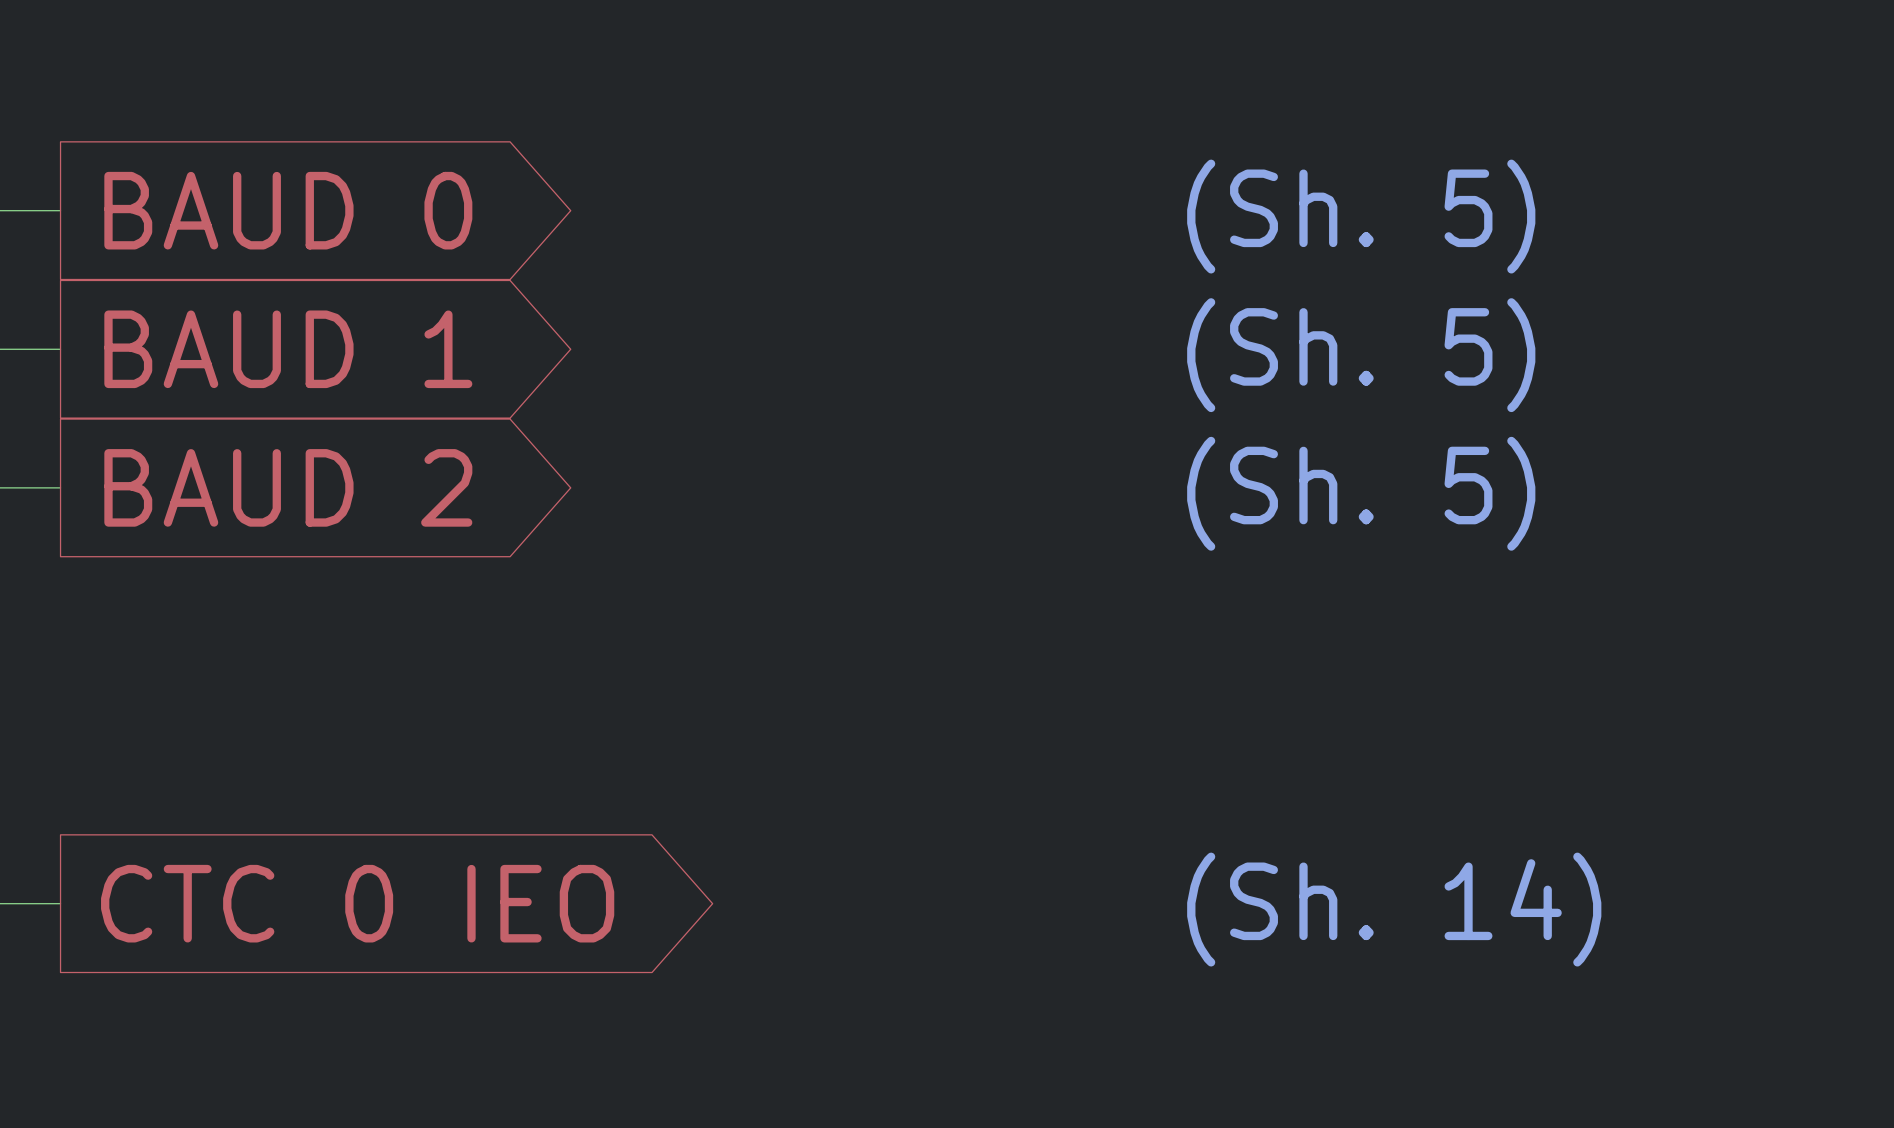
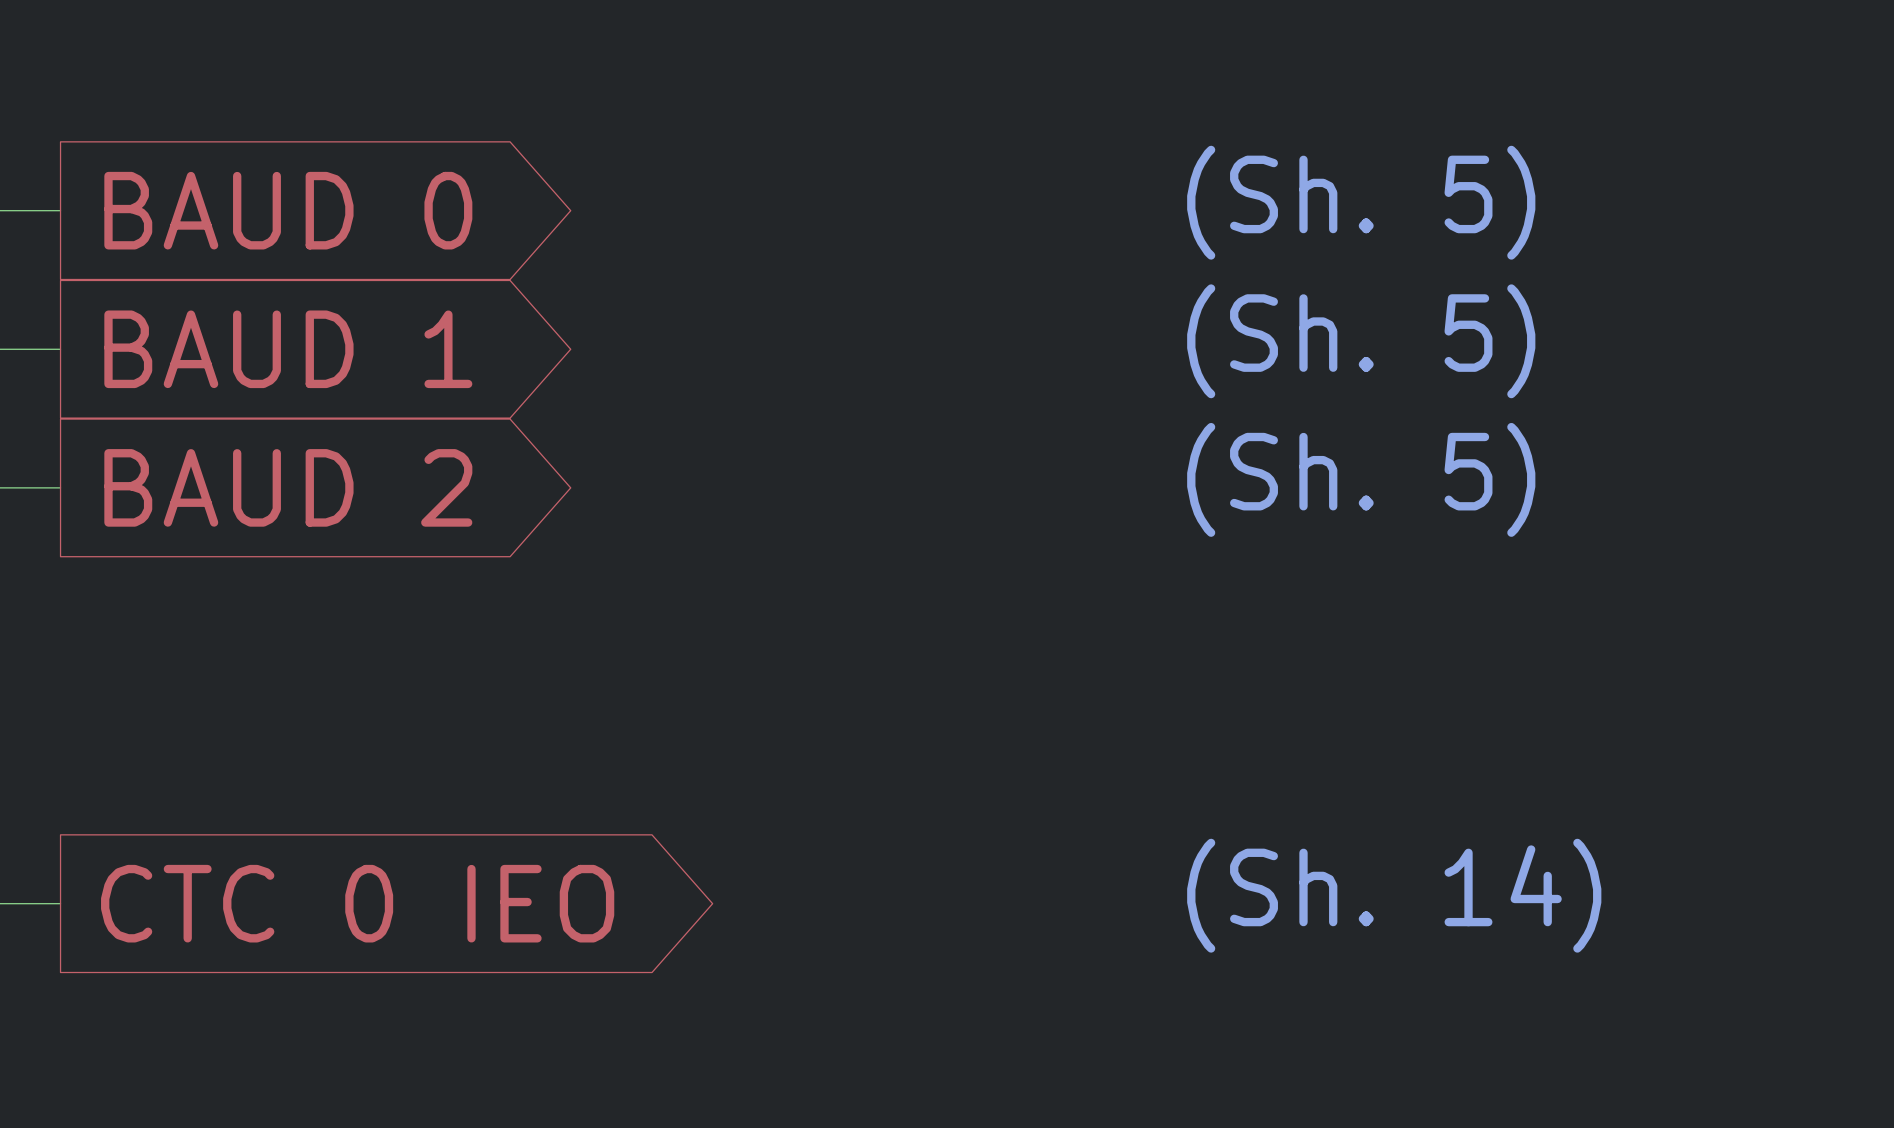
text position: (Sh. 5) (1361, 216) -> (Sh. 5) (1361, 202)
text position: (Sh. 5) (1361, 355) -> (Sh. 5) (1361, 341)
text position: (Sh. 5) (1361, 493) -> (Sh. 5) (1361, 479)
text position: (Sh. 14) (1394, 909) -> (Sh. 14) (1394, 895)

